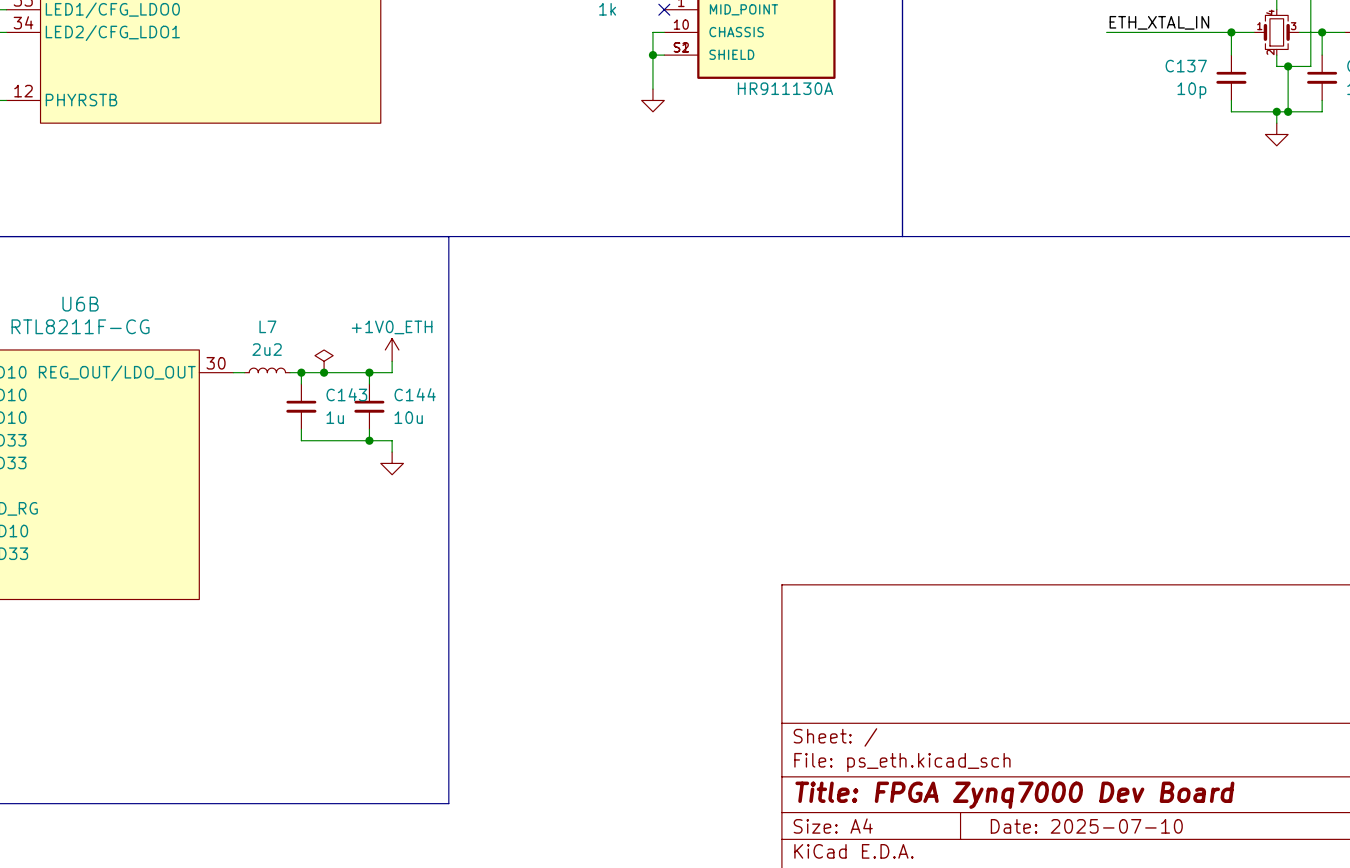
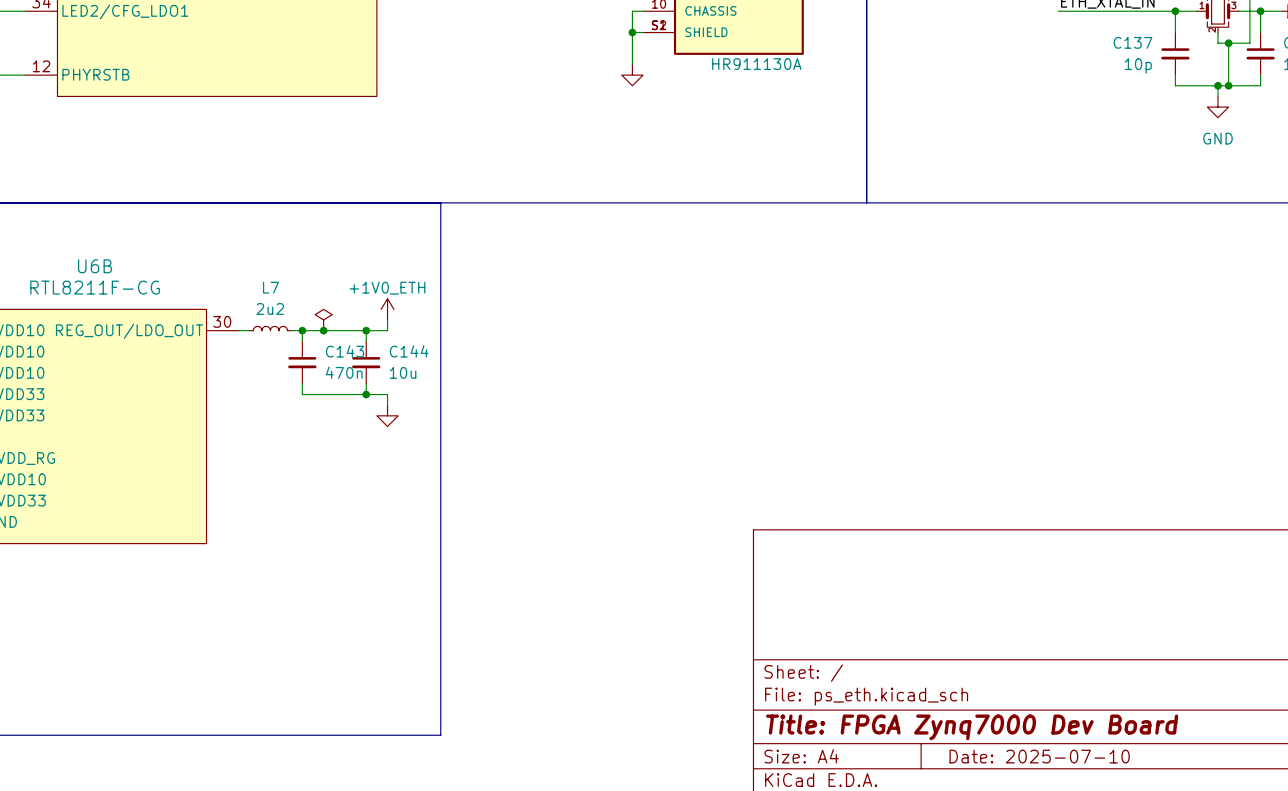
power symbol text: none -> GND (1217, 138)
C143 value: 1u (335, 417) -> 470n (344, 372)

